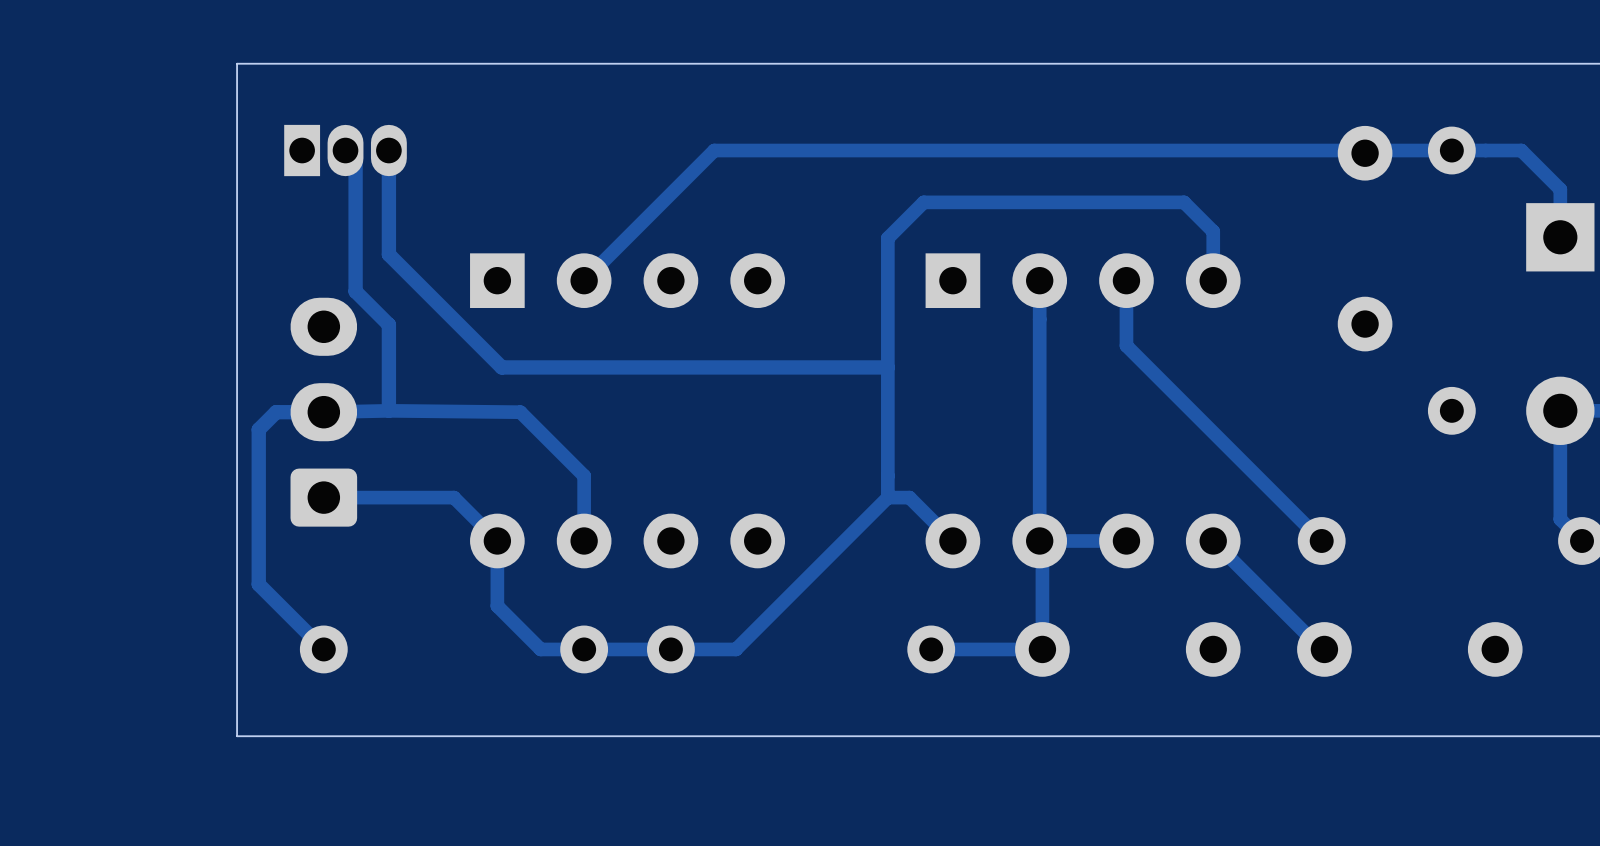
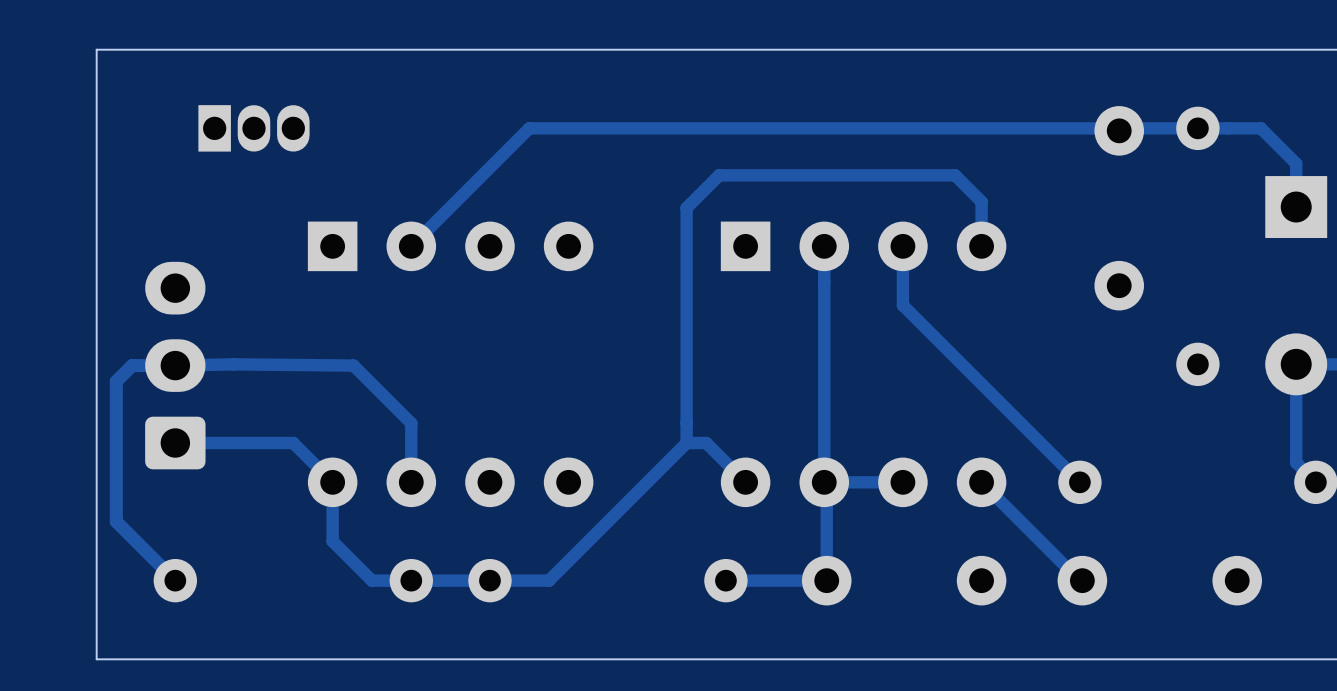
track: (345, 150) (355, 160) (355, 291) (388, 324) (388, 410) -> none
part position: (345, 150) -> (253, 128)
track: (388, 150) (388, 254) (501, 367) (887, 367) -> none

